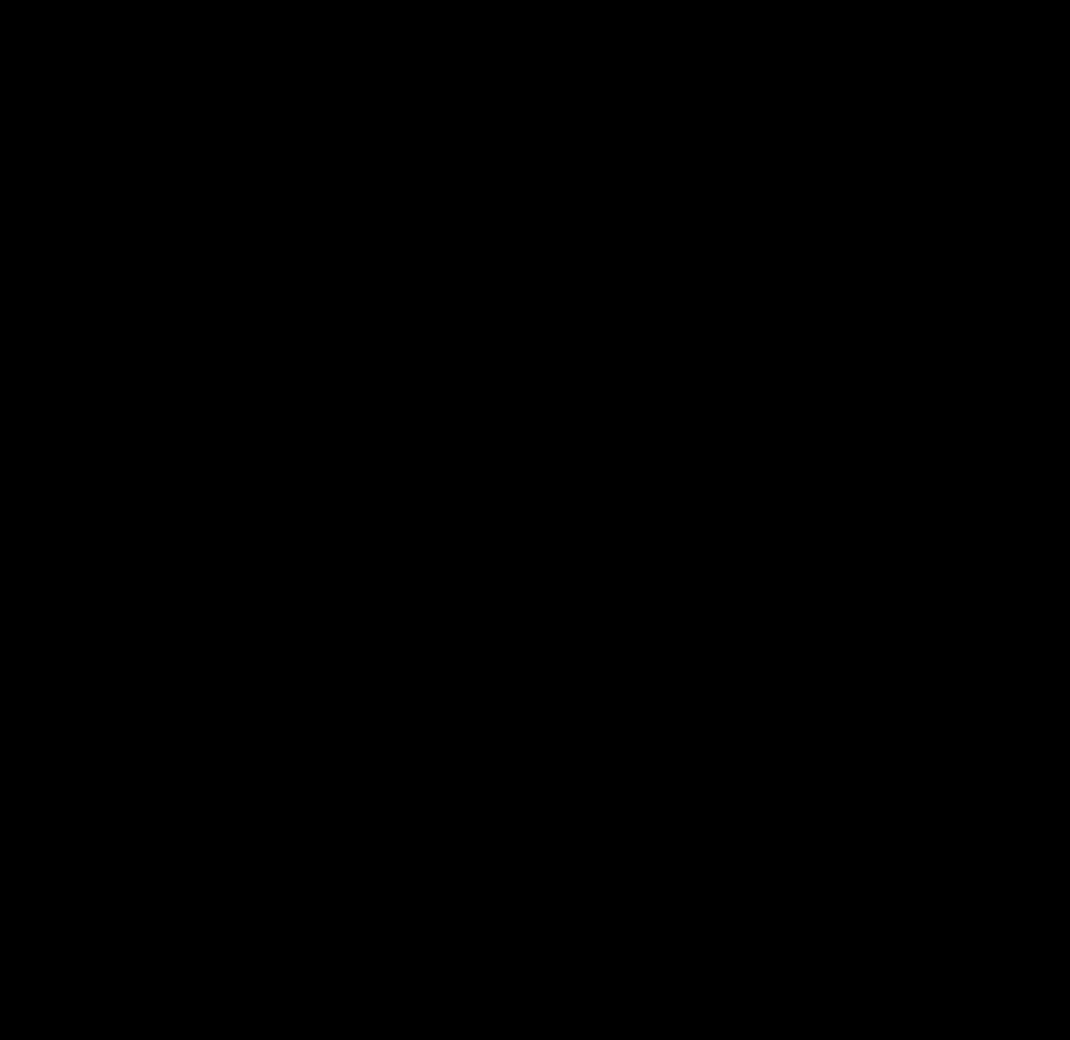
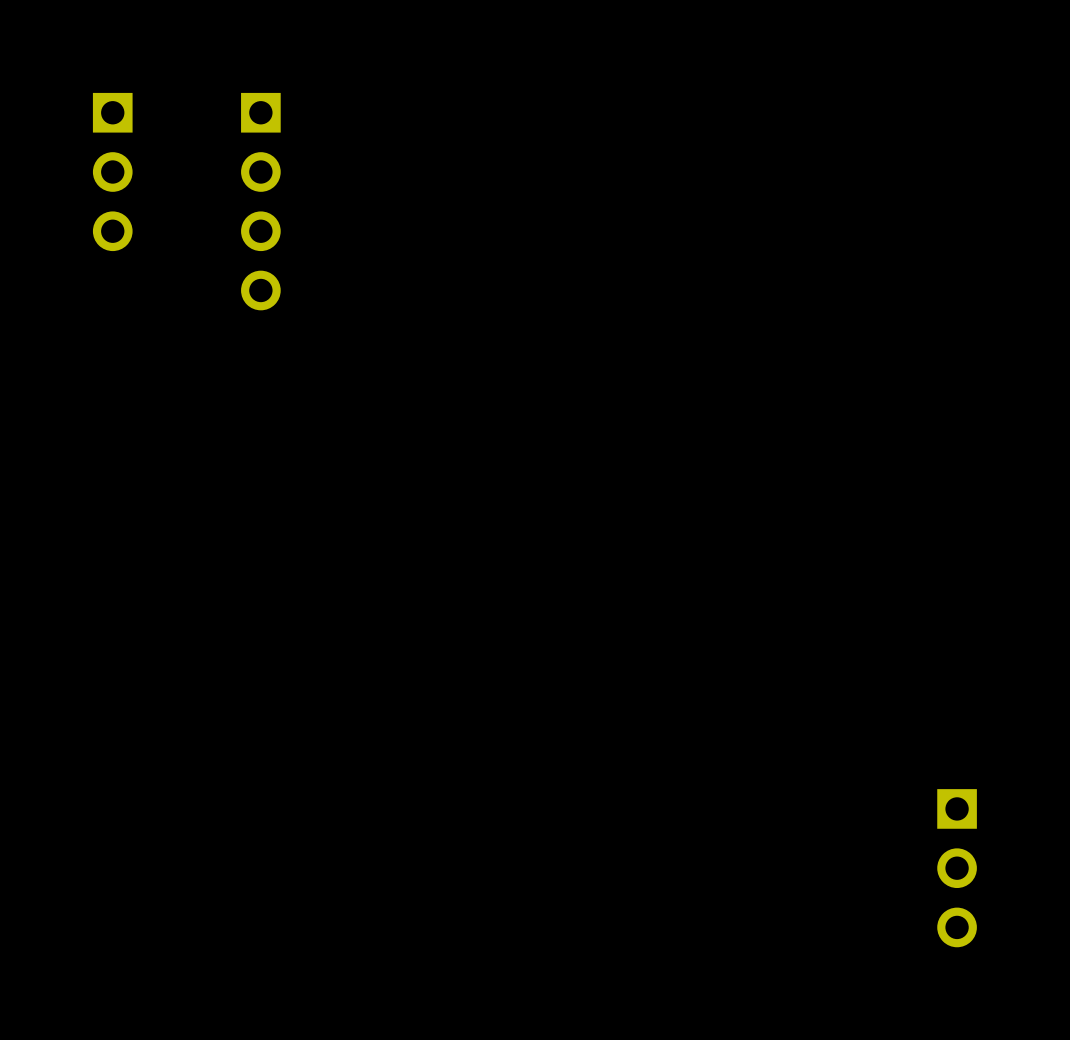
part: none -> (112, 172)
part: none -> (260, 201)
part: none -> (957, 868)

